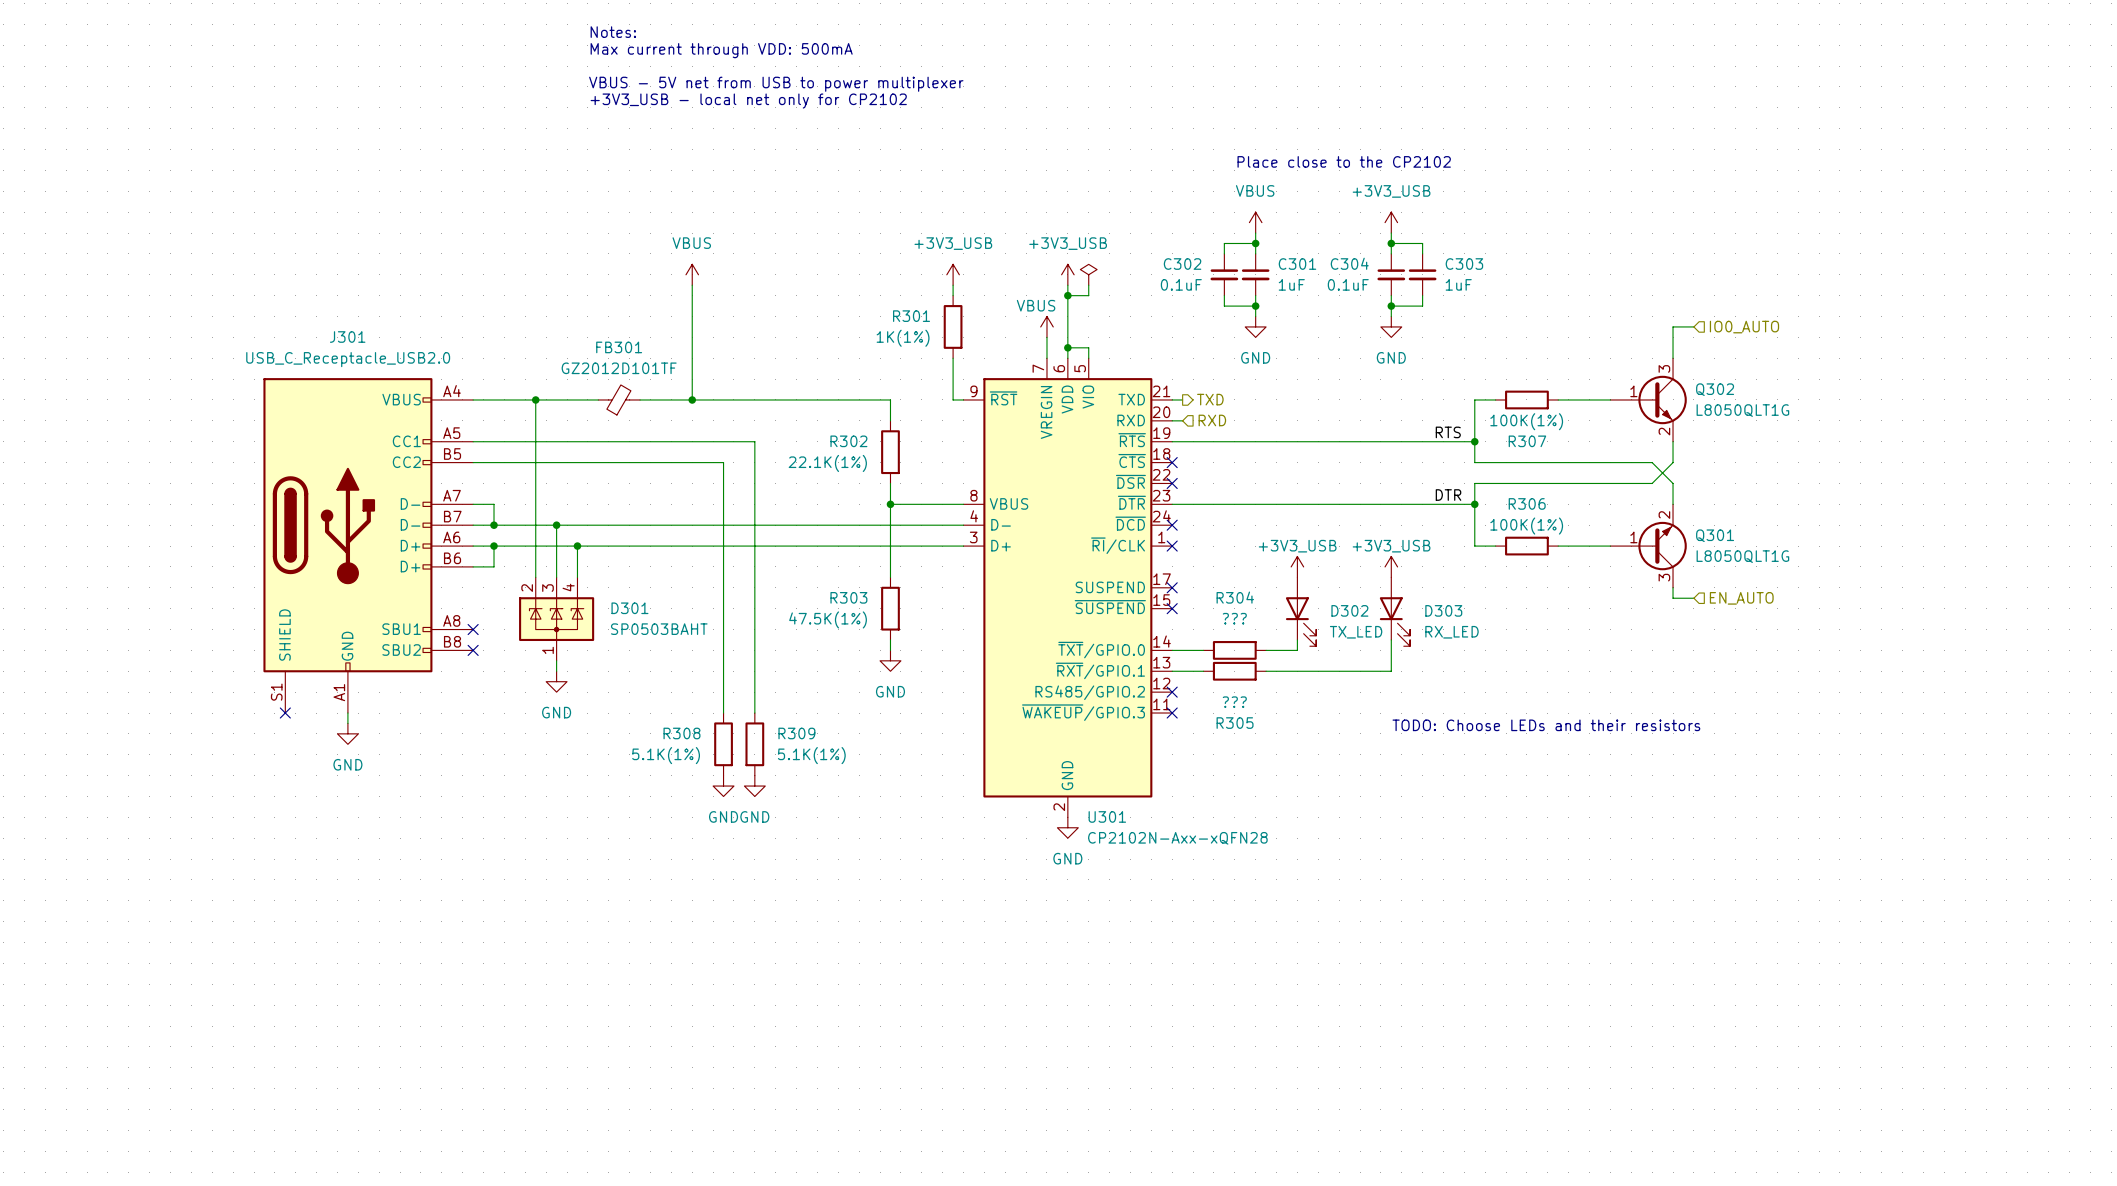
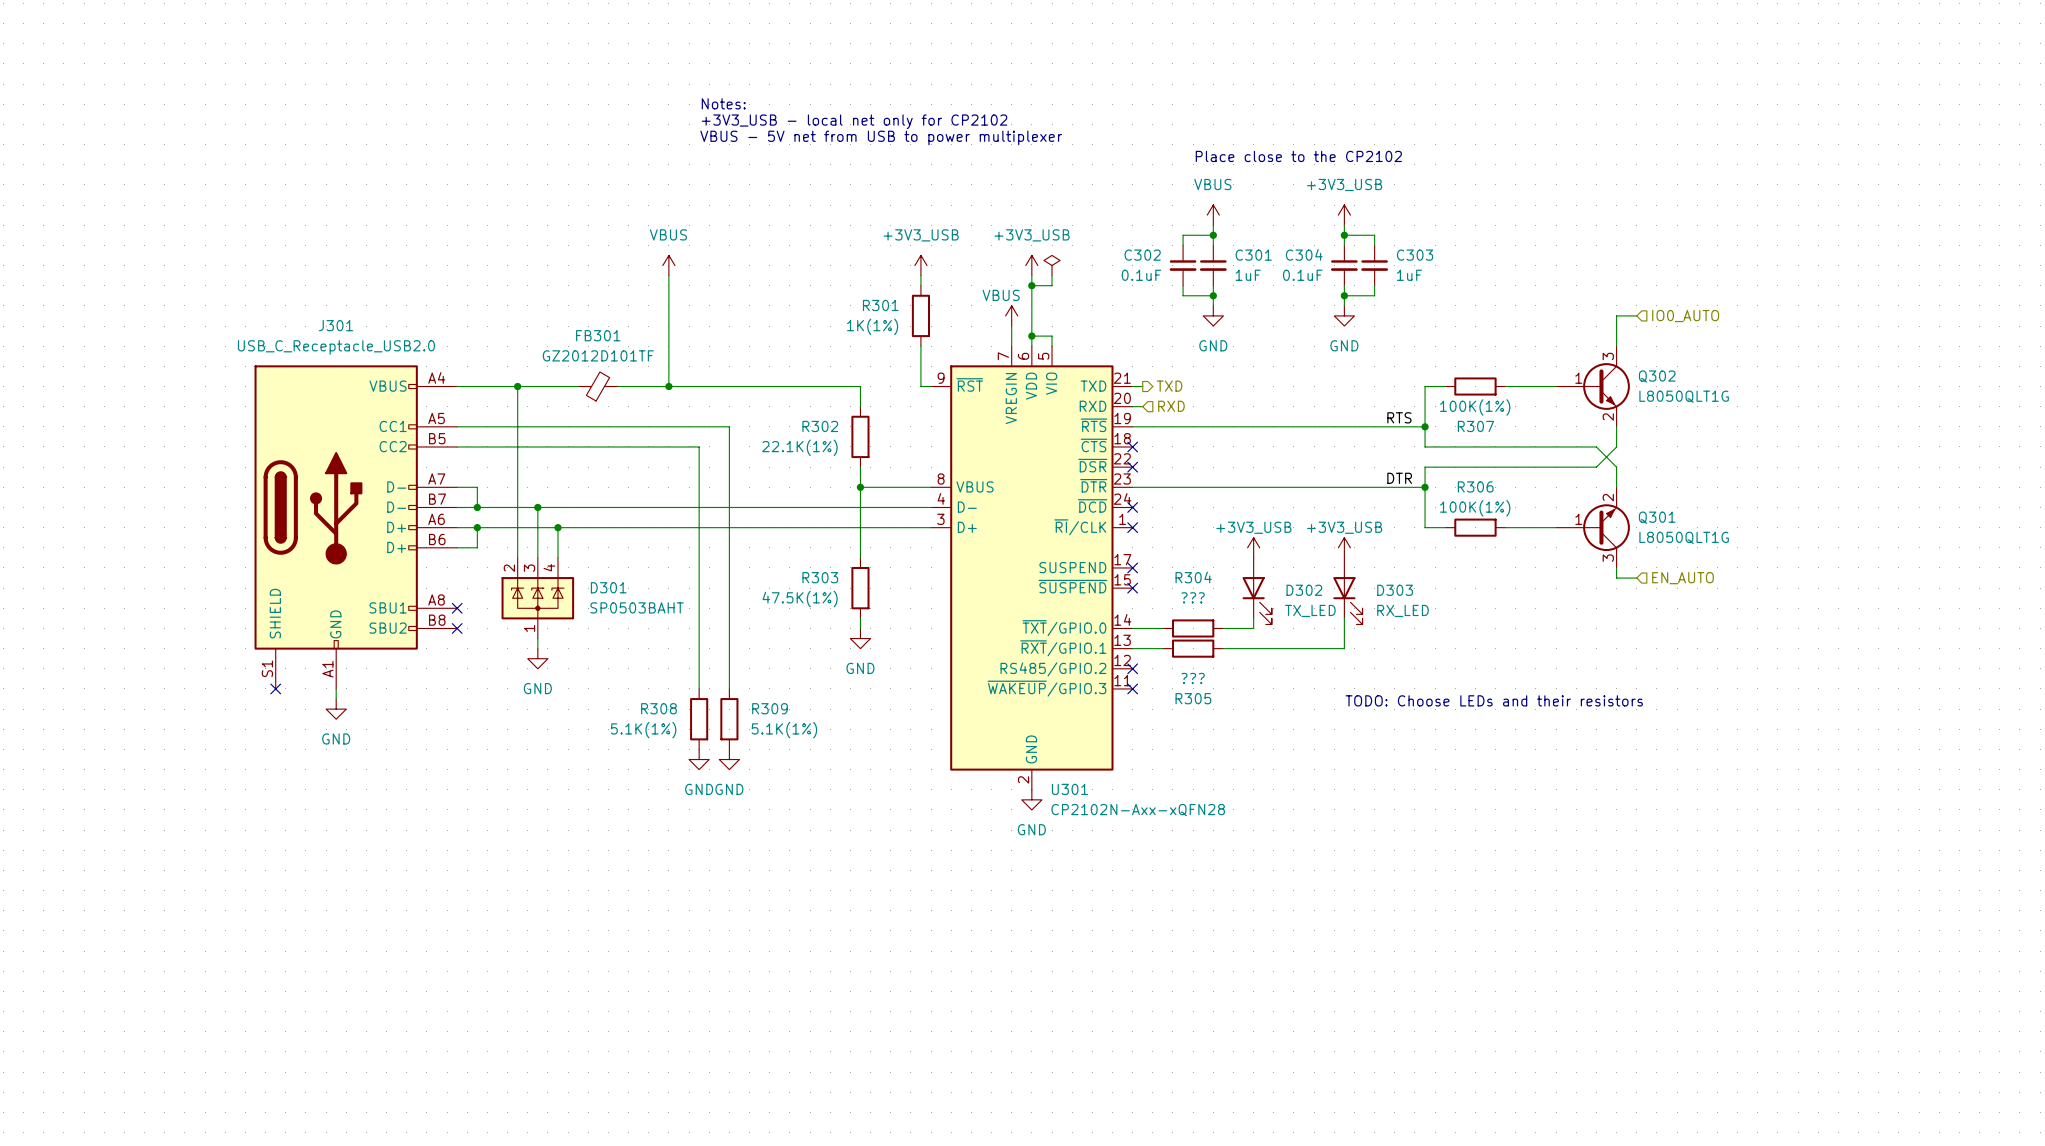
text position: Notes: (613, 32) -> Notes: (723, 103)
text: Max current through VDD: 500mA (721, 50) -> none
text position: VBUS - 5V net from USB to power multiplexer (776, 84) -> VBUS - 5V net from USB to power multiplexer (881, 137)
text position: +3V3_USB - local net only for CP2102 (748, 101) -> +3V3_USB - local net only for CP2102 (854, 121)

